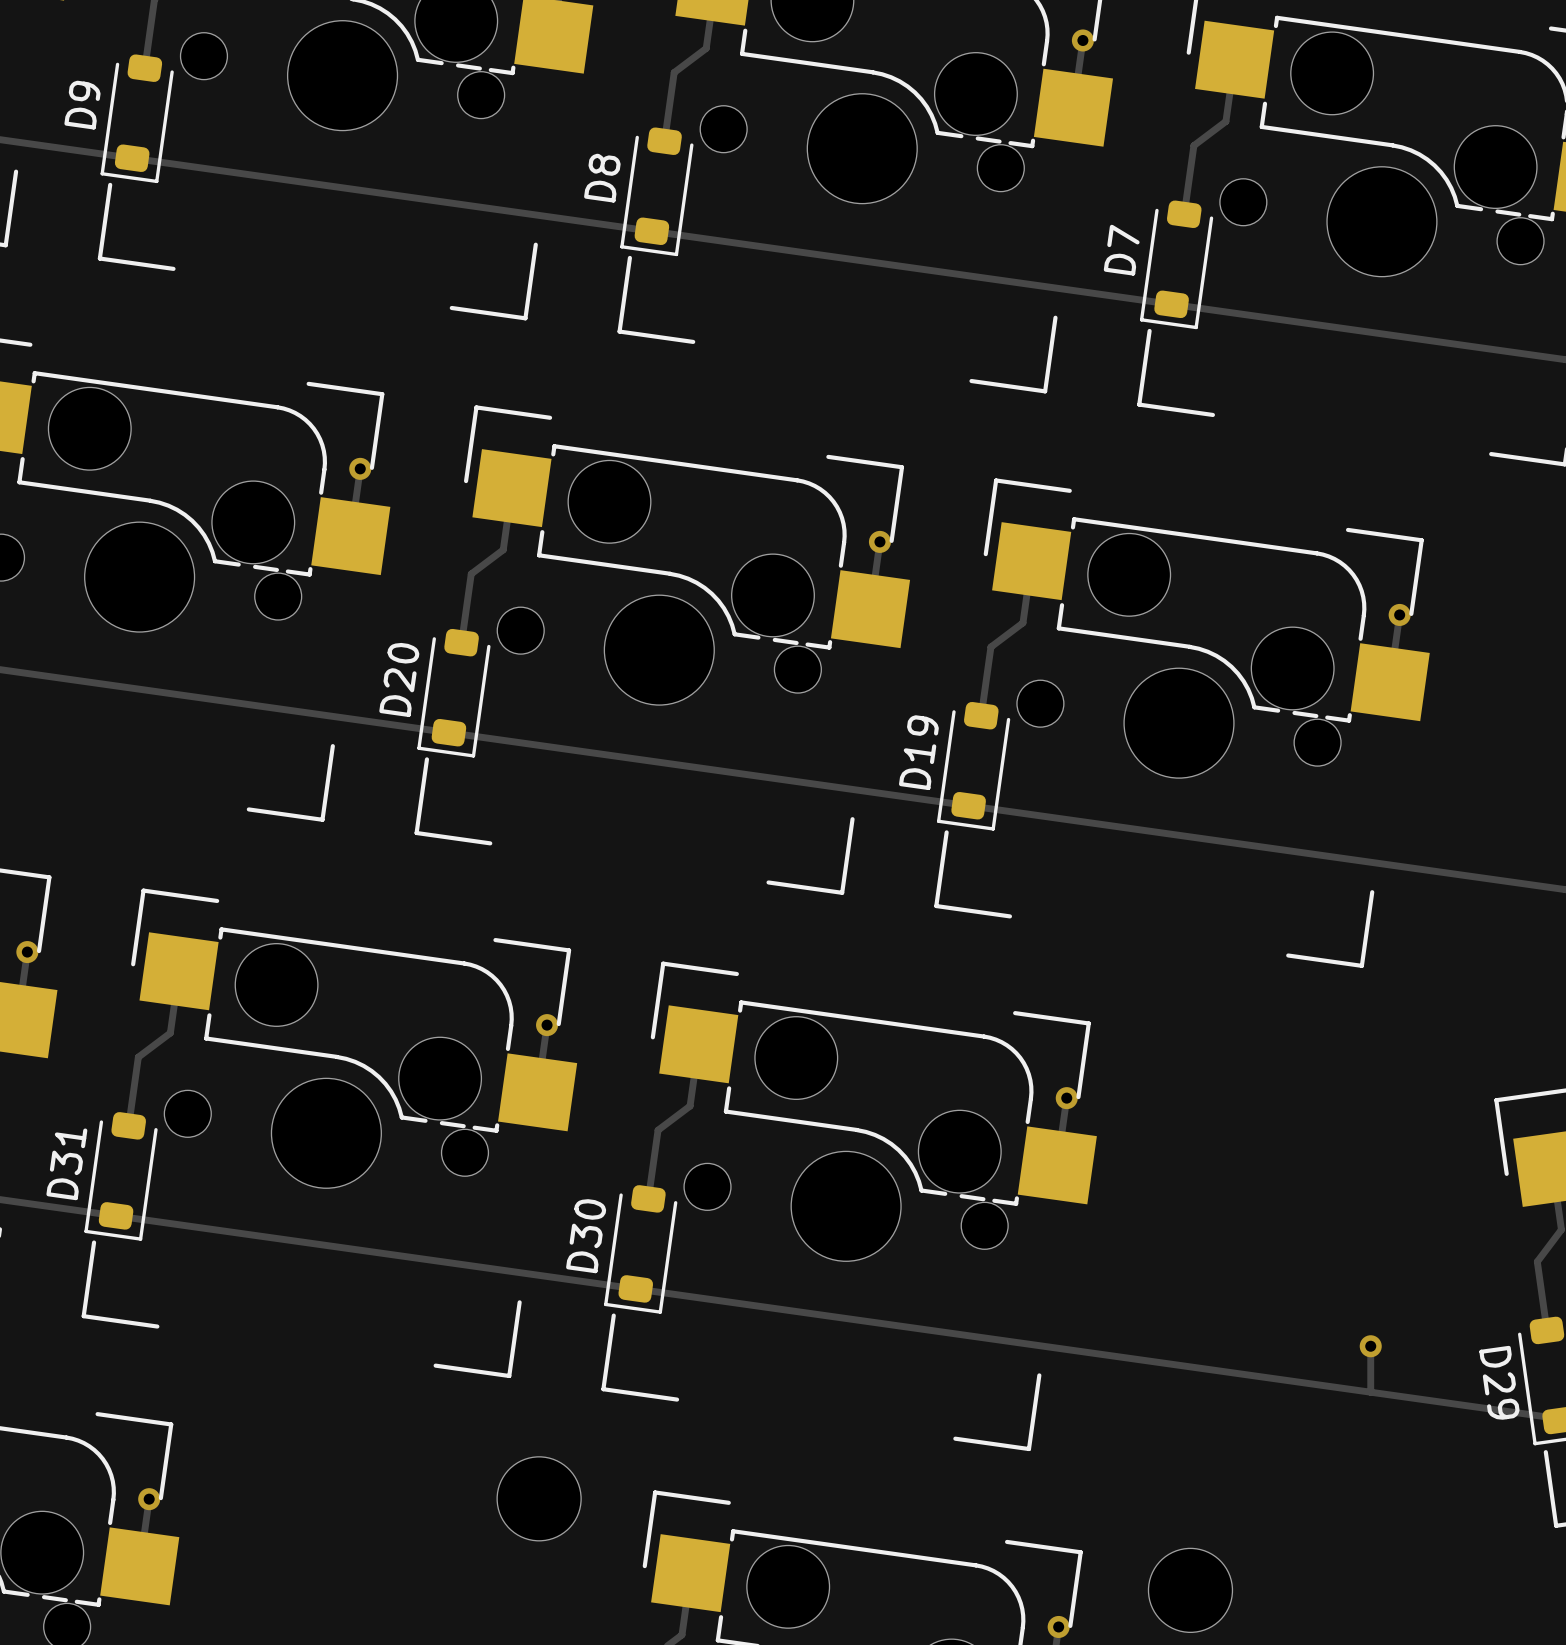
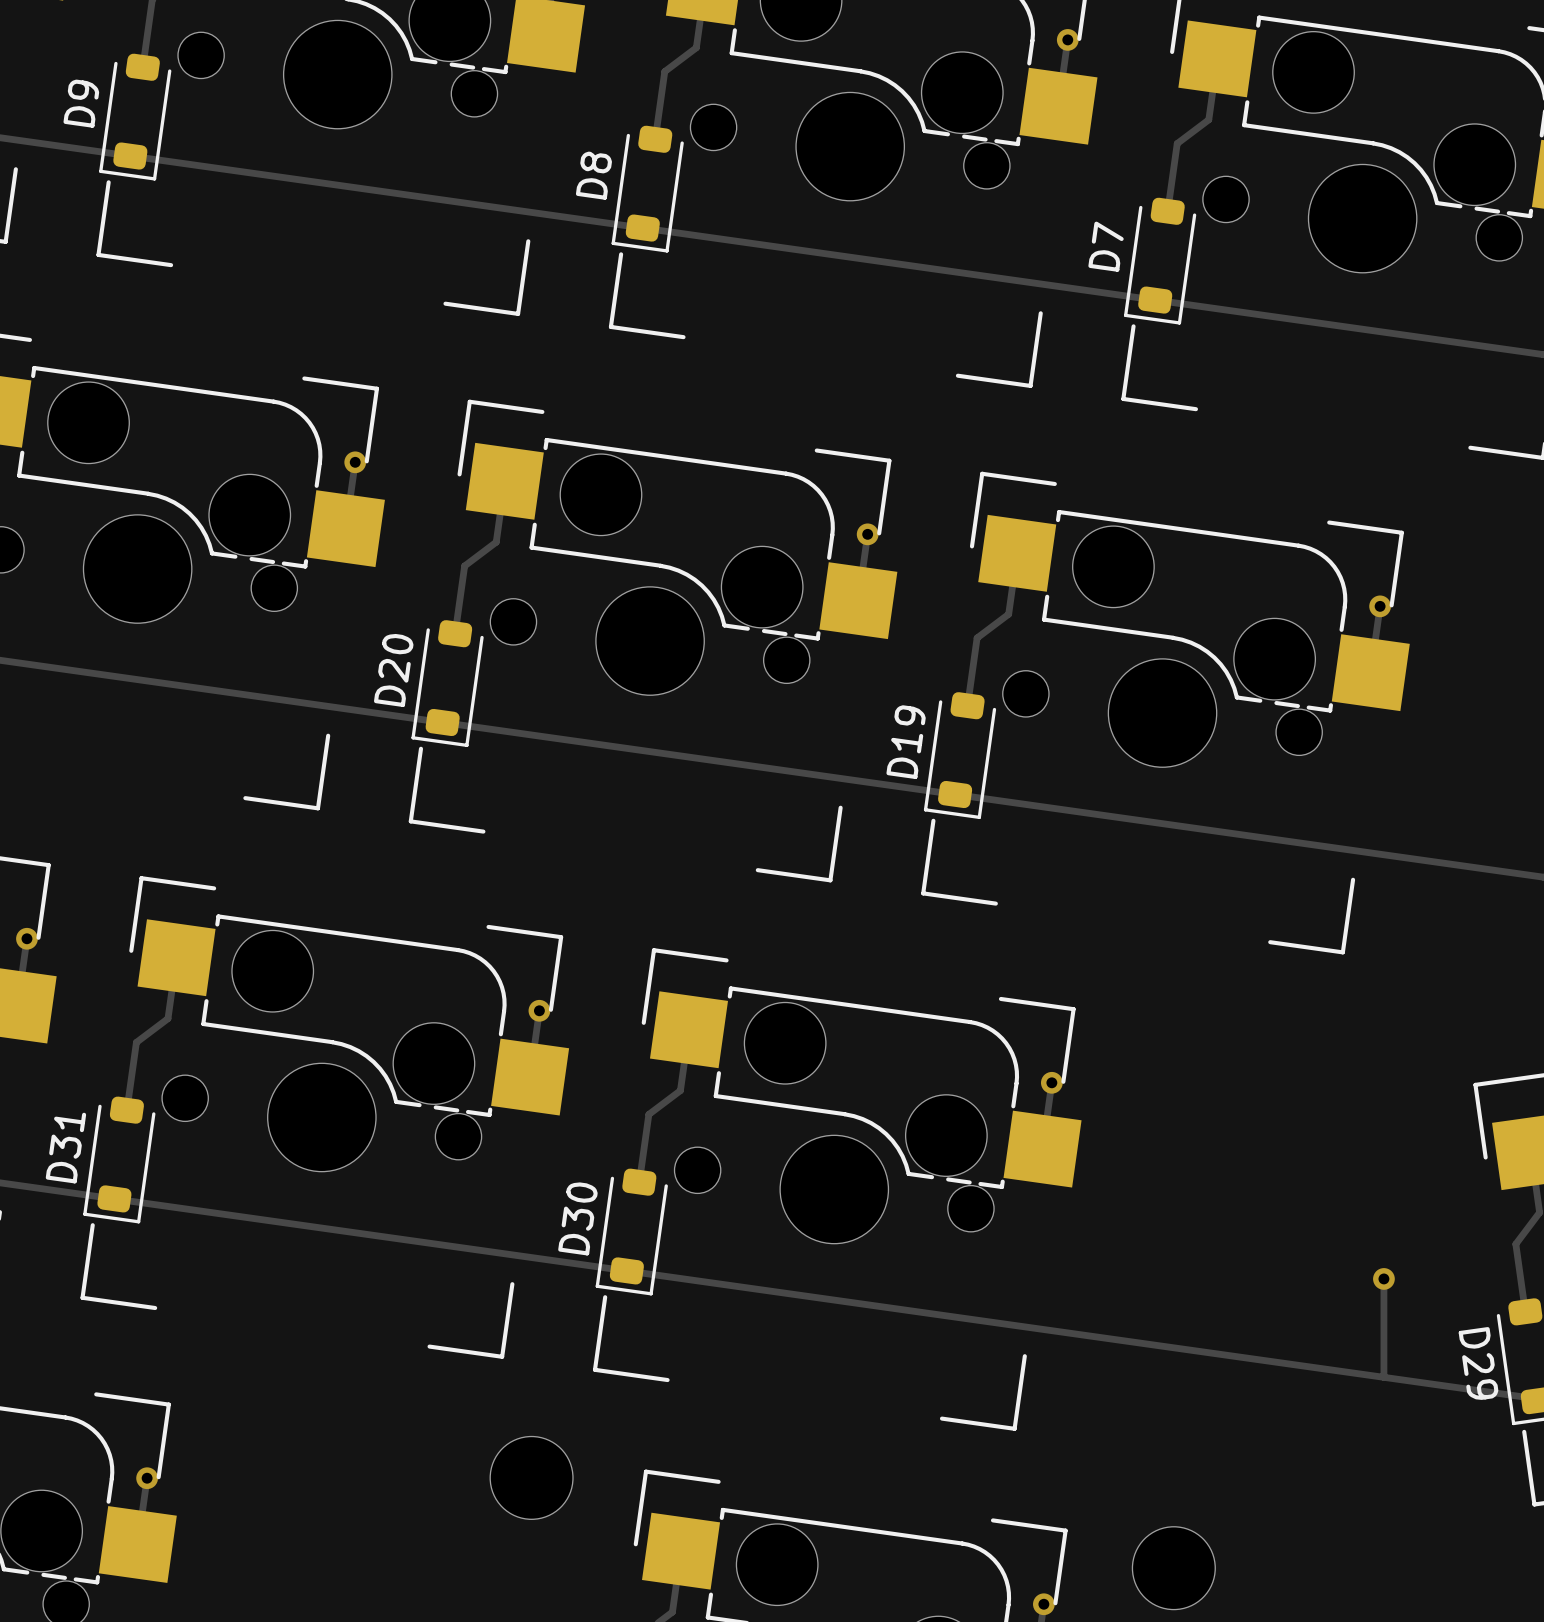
track: none -> (1383, 1278) (1383, 1377)
track: (1370, 1346) (1370, 1392) -> none
via position: (1370, 1346) -> (1383, 1278)

